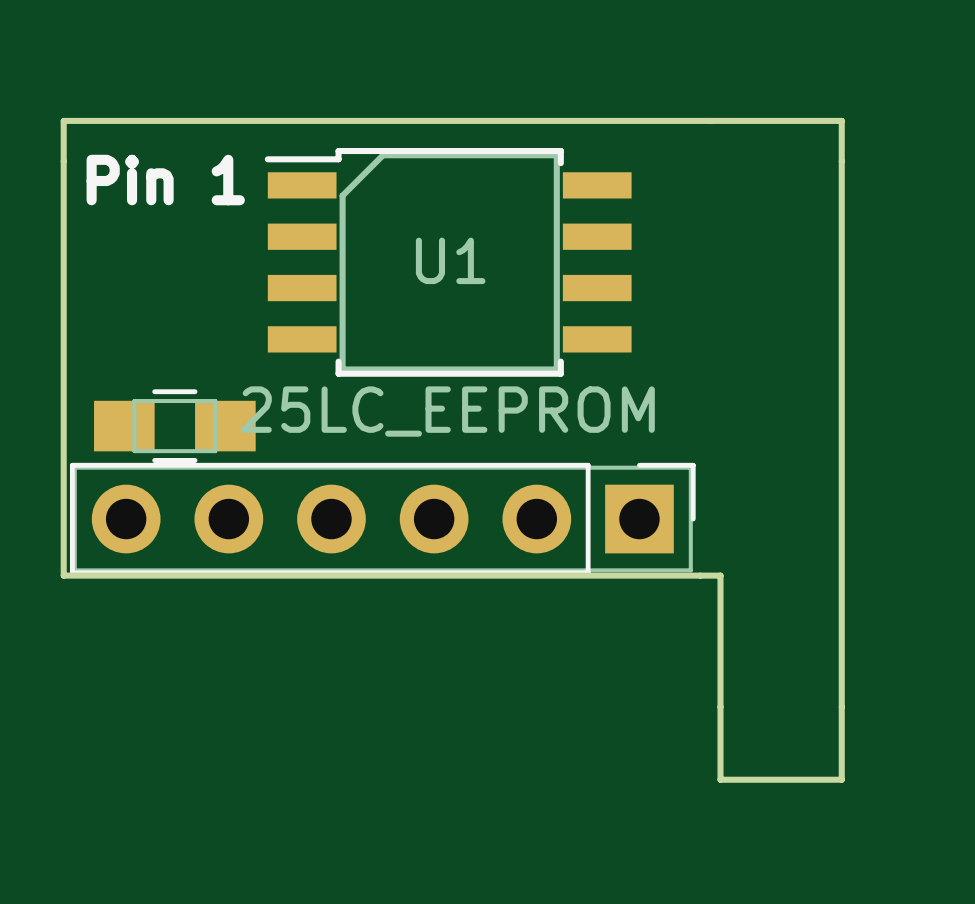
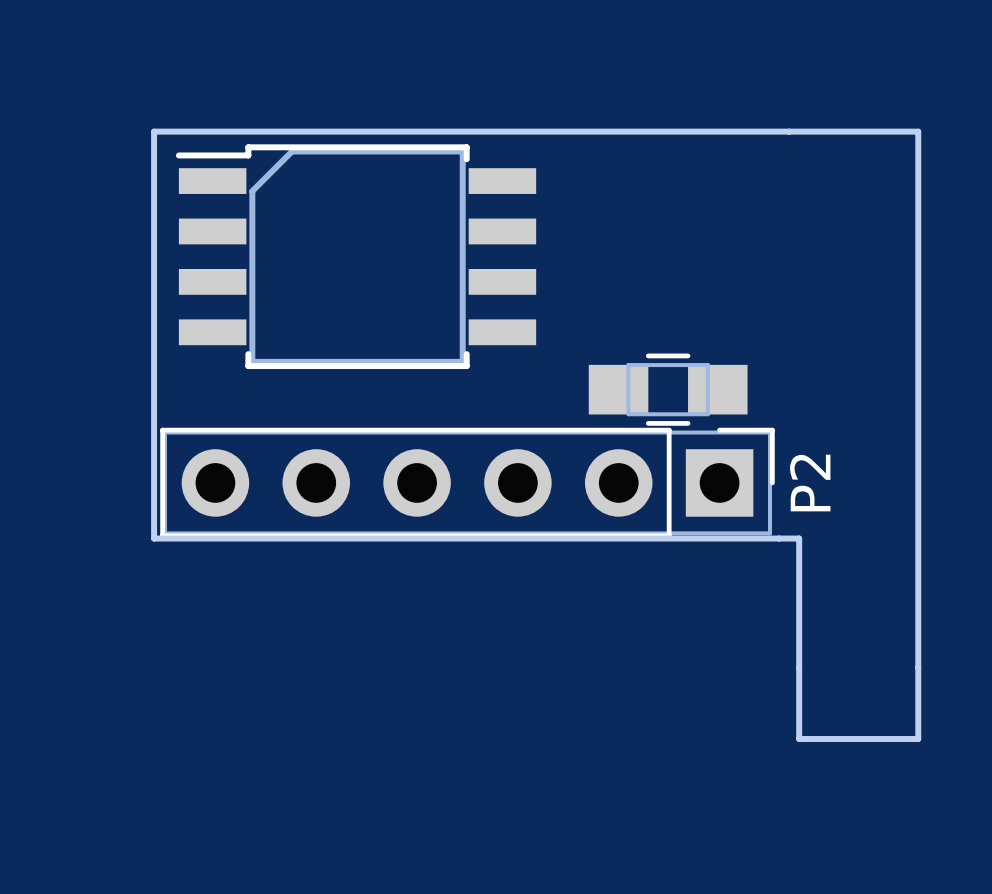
board edge: (63, 161) (63, 120) (841, 120) (841, 161) -> (154, 131) (918, 131)
text: Pin 1 (165, 180) -> none
U1: 25LC_EEPROM (448, 262) -> none
part: none -> (356, 256)
part position: (174, 426) -> (668, 389)
P2 name: none -> P2 (810, 483)

